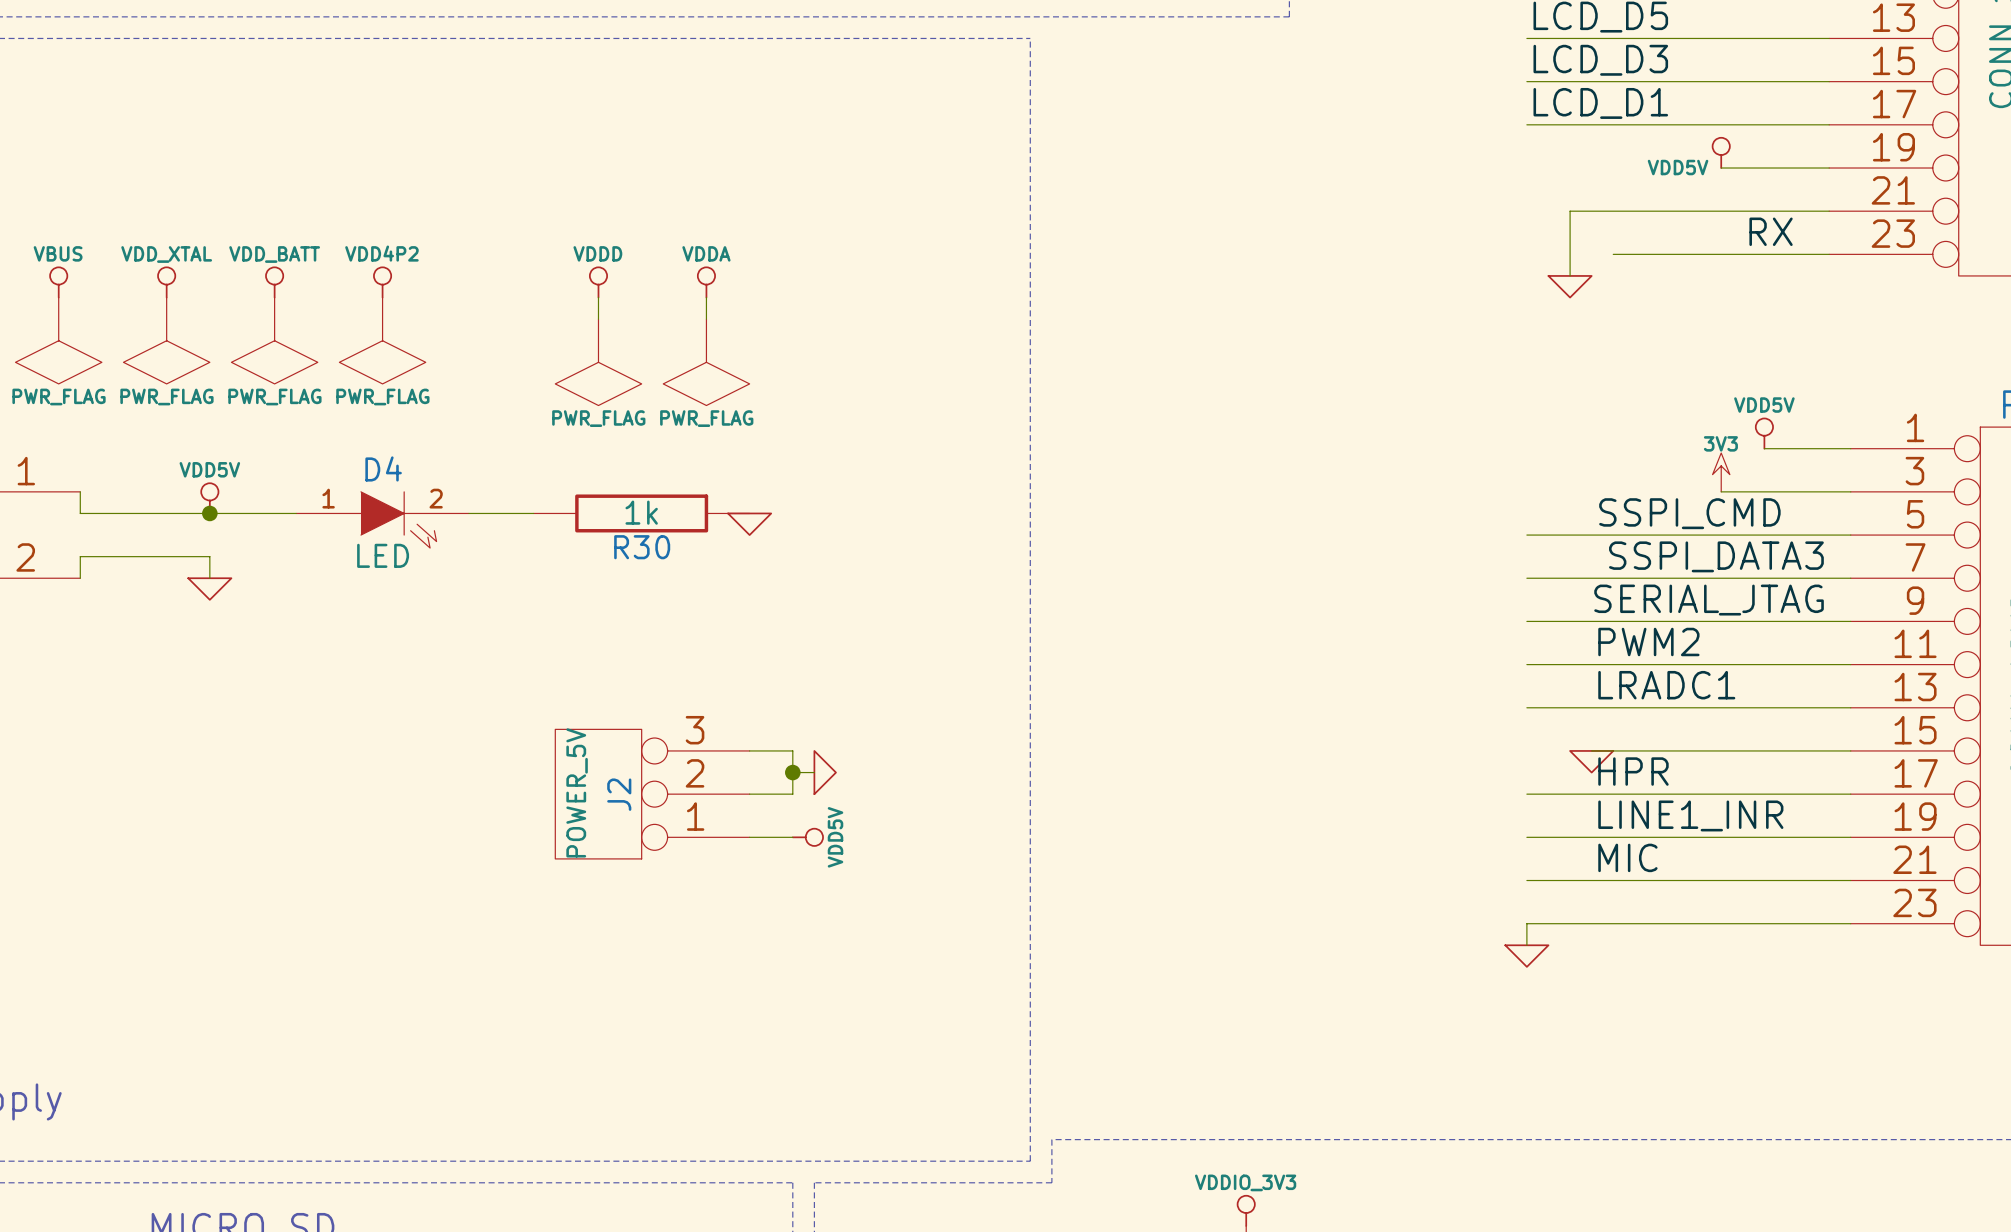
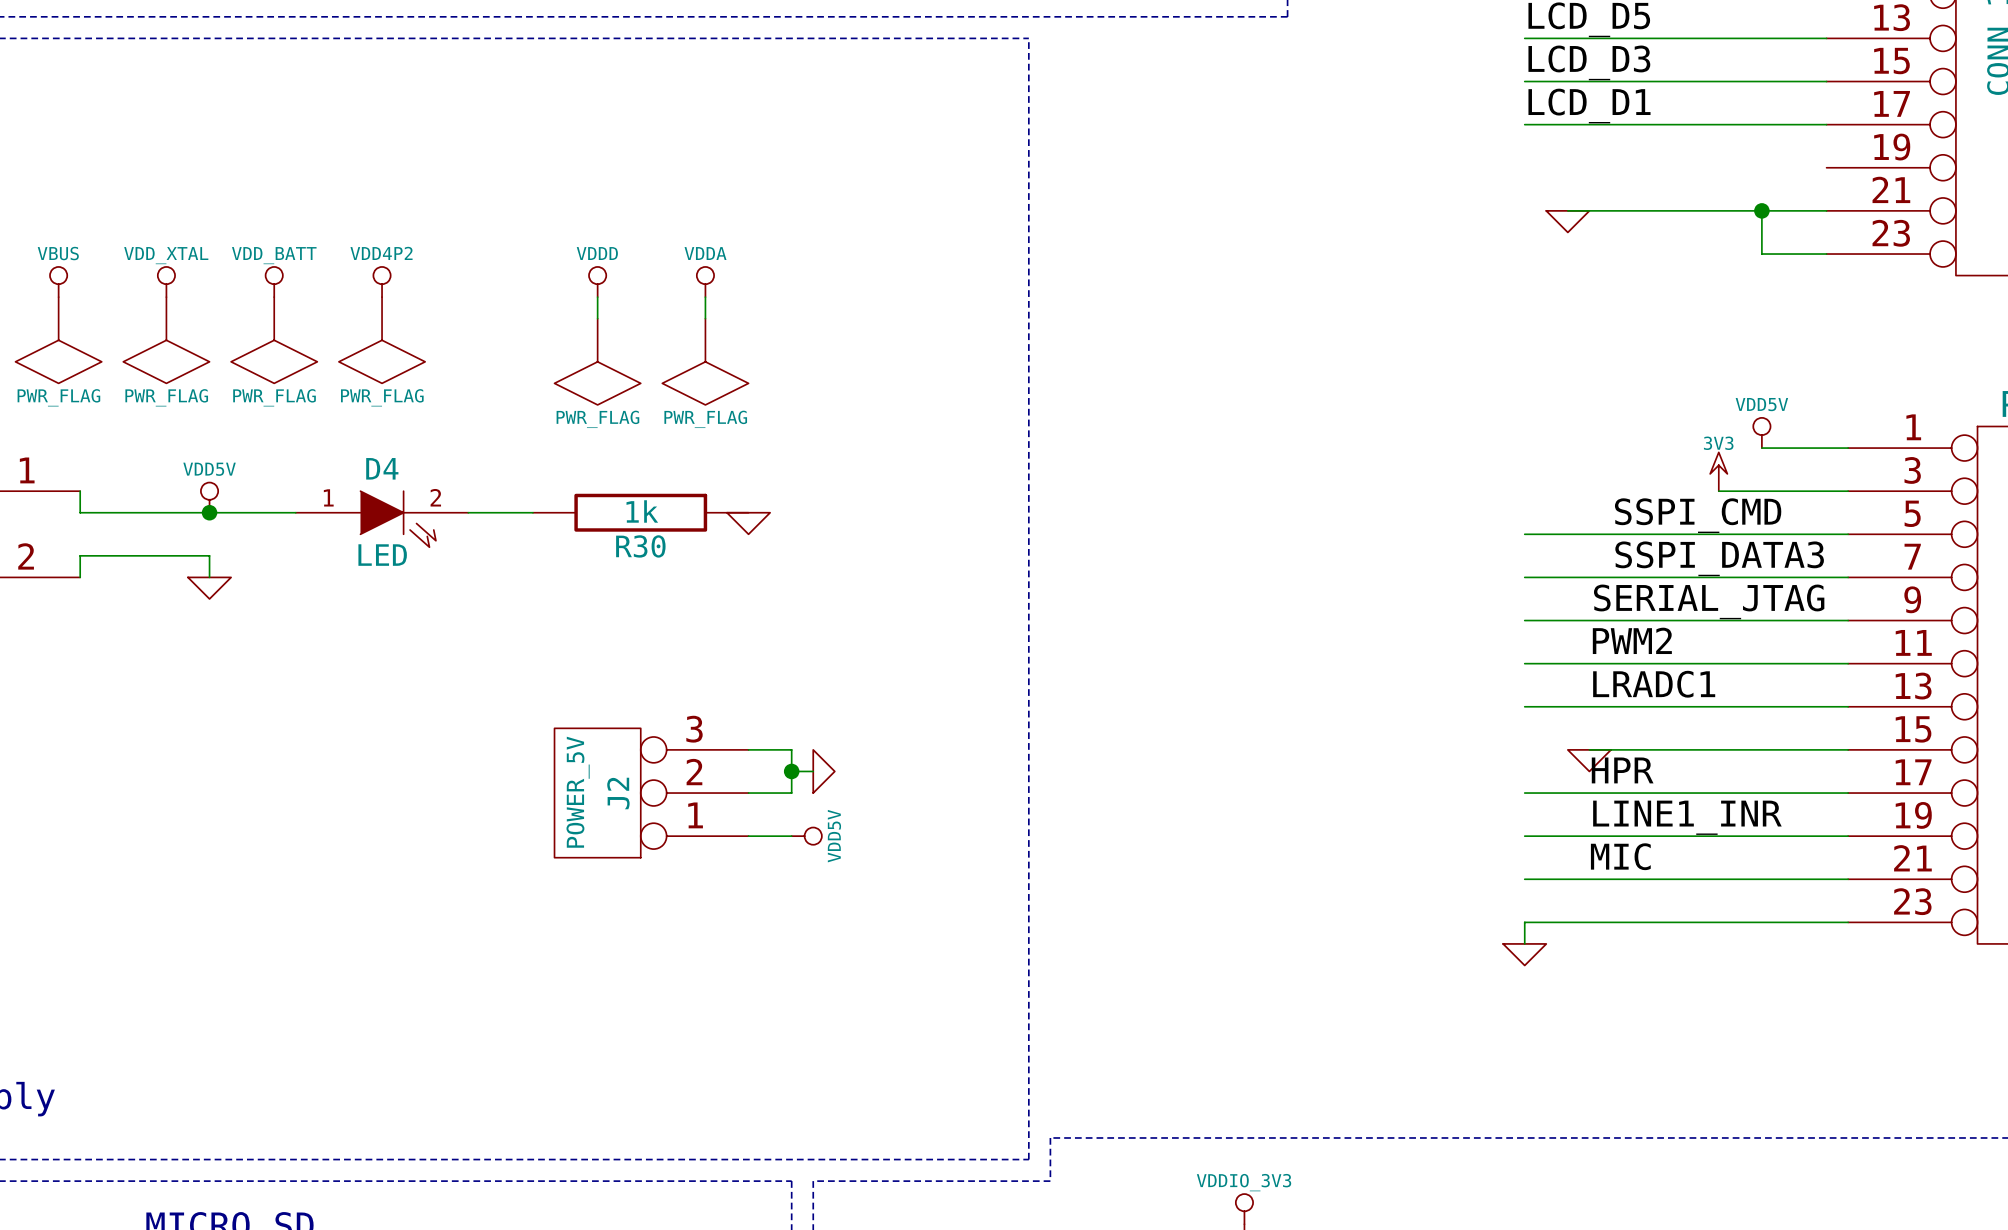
power symbol: VDD5V (1721, 152) -> none
wire: (1721, 168) (1829, 168) -> none
wire: (1570, 211) (1570, 275) -> none
junction: none -> (1761, 210)
label: RX (1771, 231) -> none
wire: (1613, 254) (1764, 254) -> (1761, 210) (1761, 254)
power symbol position: (1570, 286) -> (1567, 221)

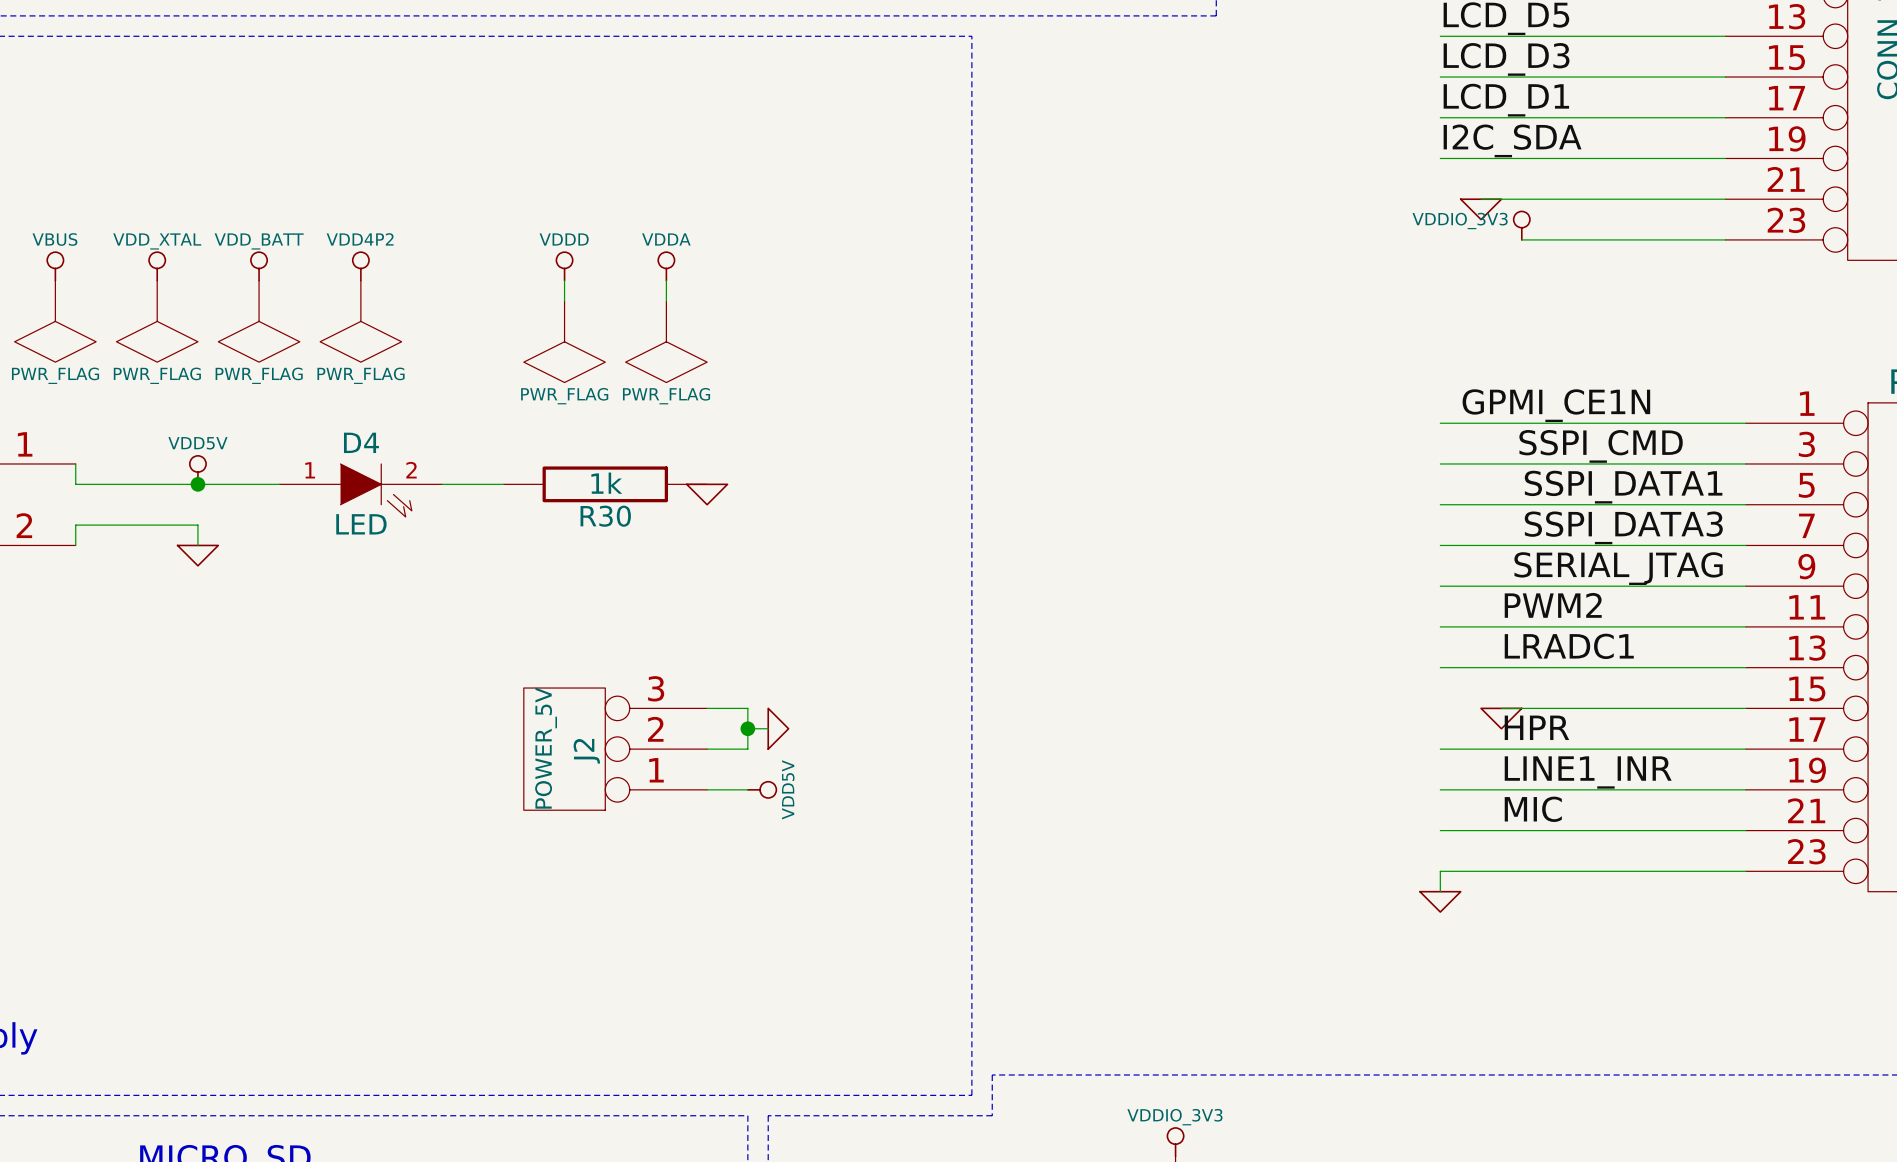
label: none -> I2C_SDA (1512, 140)
wire: none -> (1440, 158) (1725, 158)
wire: (1761, 210) (1761, 254) -> (1521, 239) (1664, 239)
junction: (1761, 210) -> none
power symbol: none -> VDDIO_3V3 (1521, 225)
label: none -> GPMI_CE1N (1556, 405)
power symbol: VDD5V (1761, 432) -> none
wire: none -> (1440, 423) (1664, 423)
power symbol: 3V3 (1718, 471) -> none
wire: none -> (1440, 463) (1623, 463)
label position: SSPI_CMD (1698, 515) -> SSPI_CMD (1601, 446)
label: none -> SSPI_DATA1 (1623, 487)

